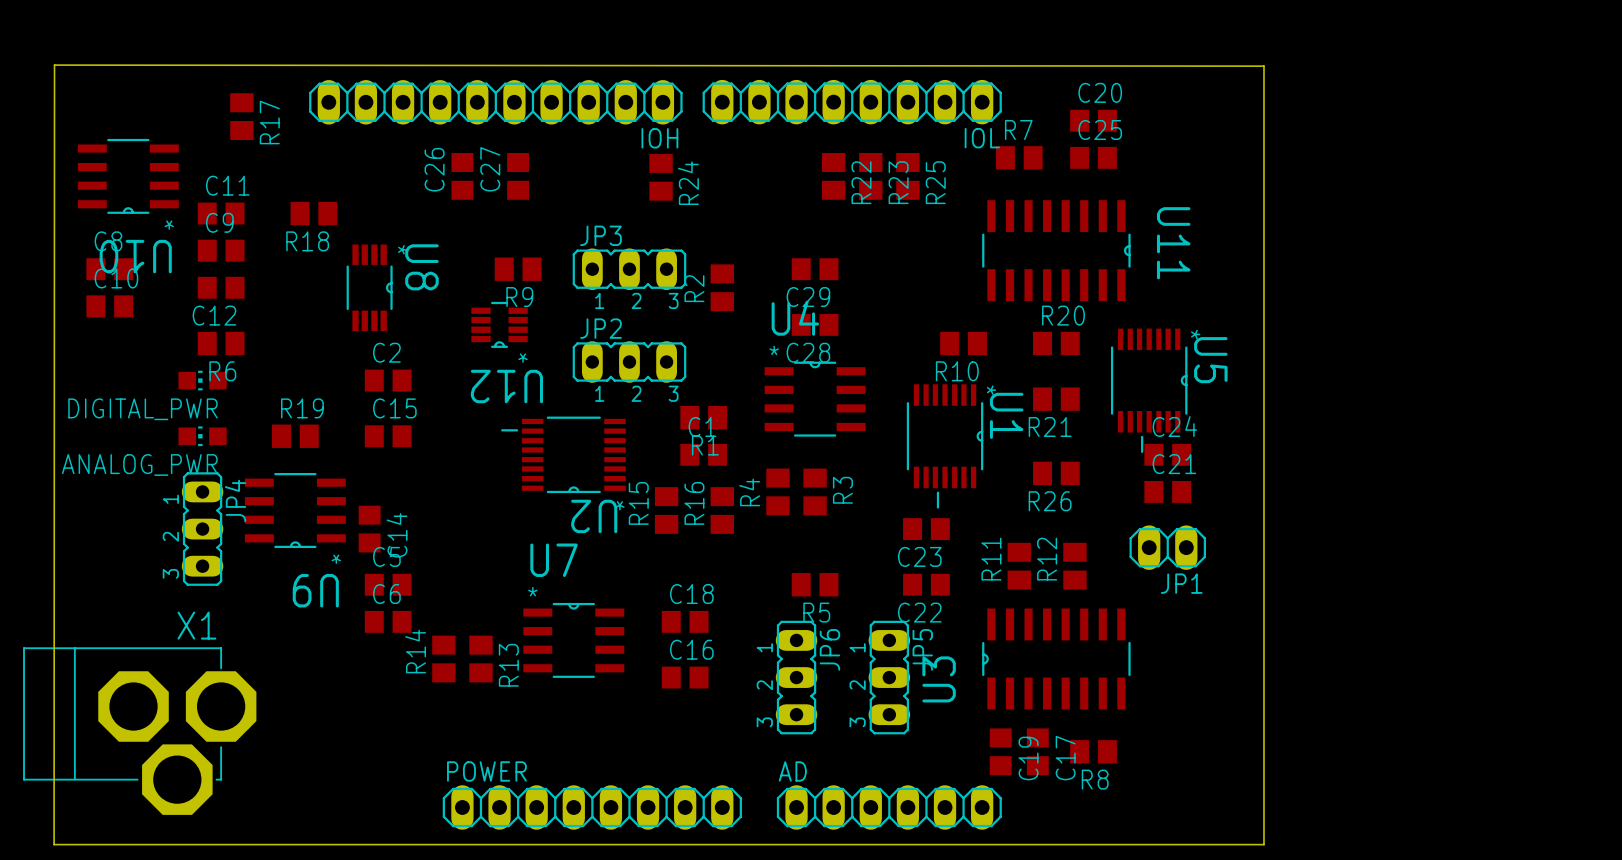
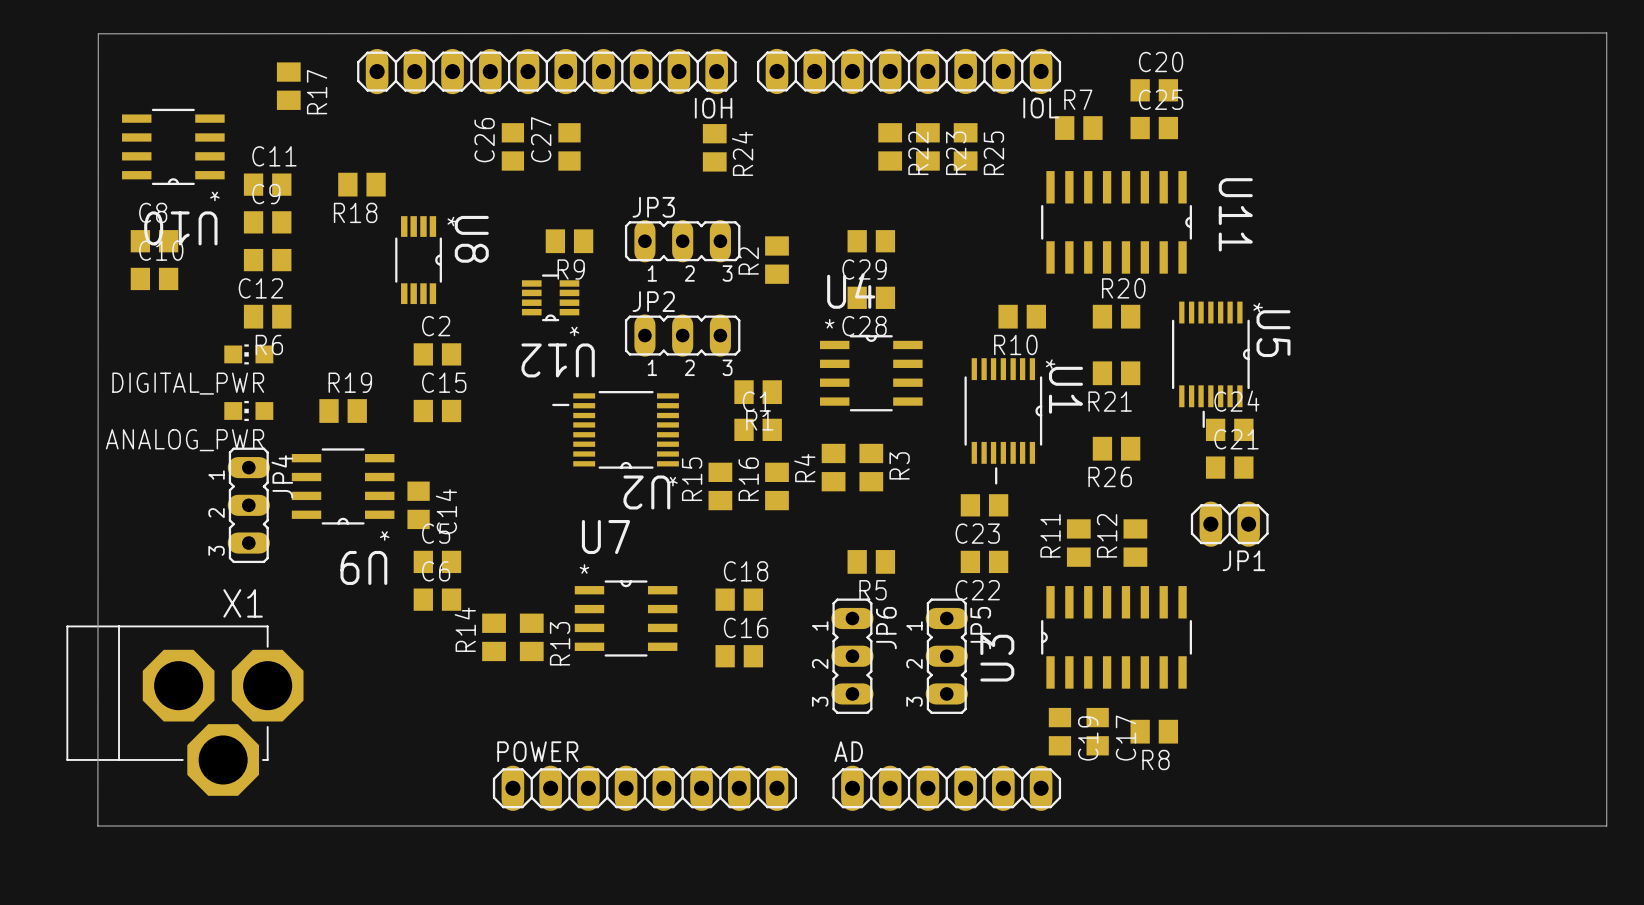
board edge: (54, 65) (1263, 66) (1263, 844) -> (98, 33) (1606, 32) (1606, 826) (1327, 826)

